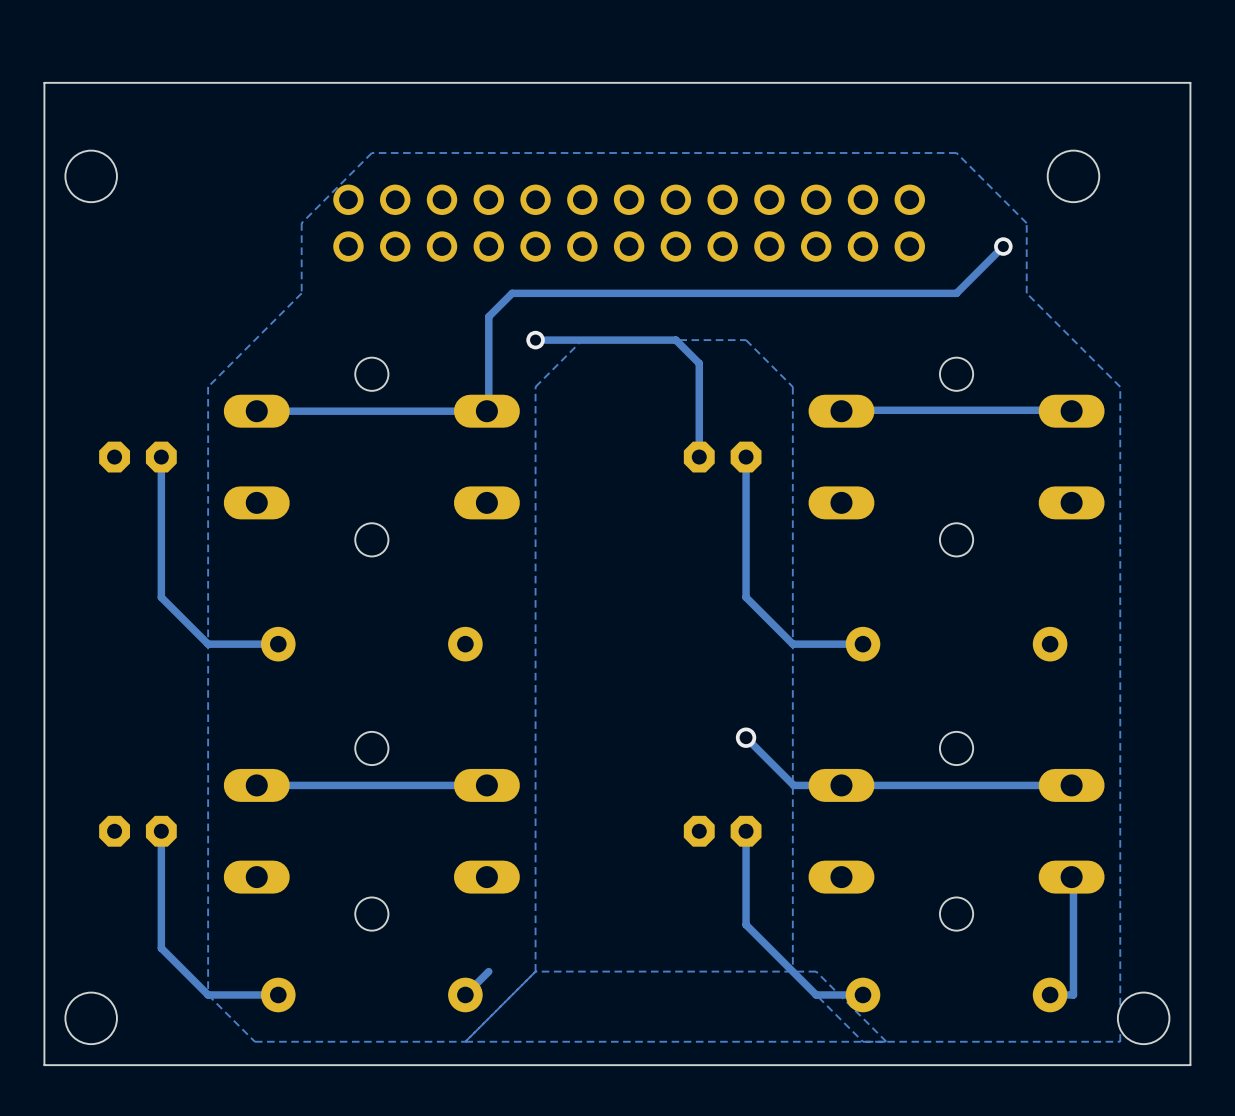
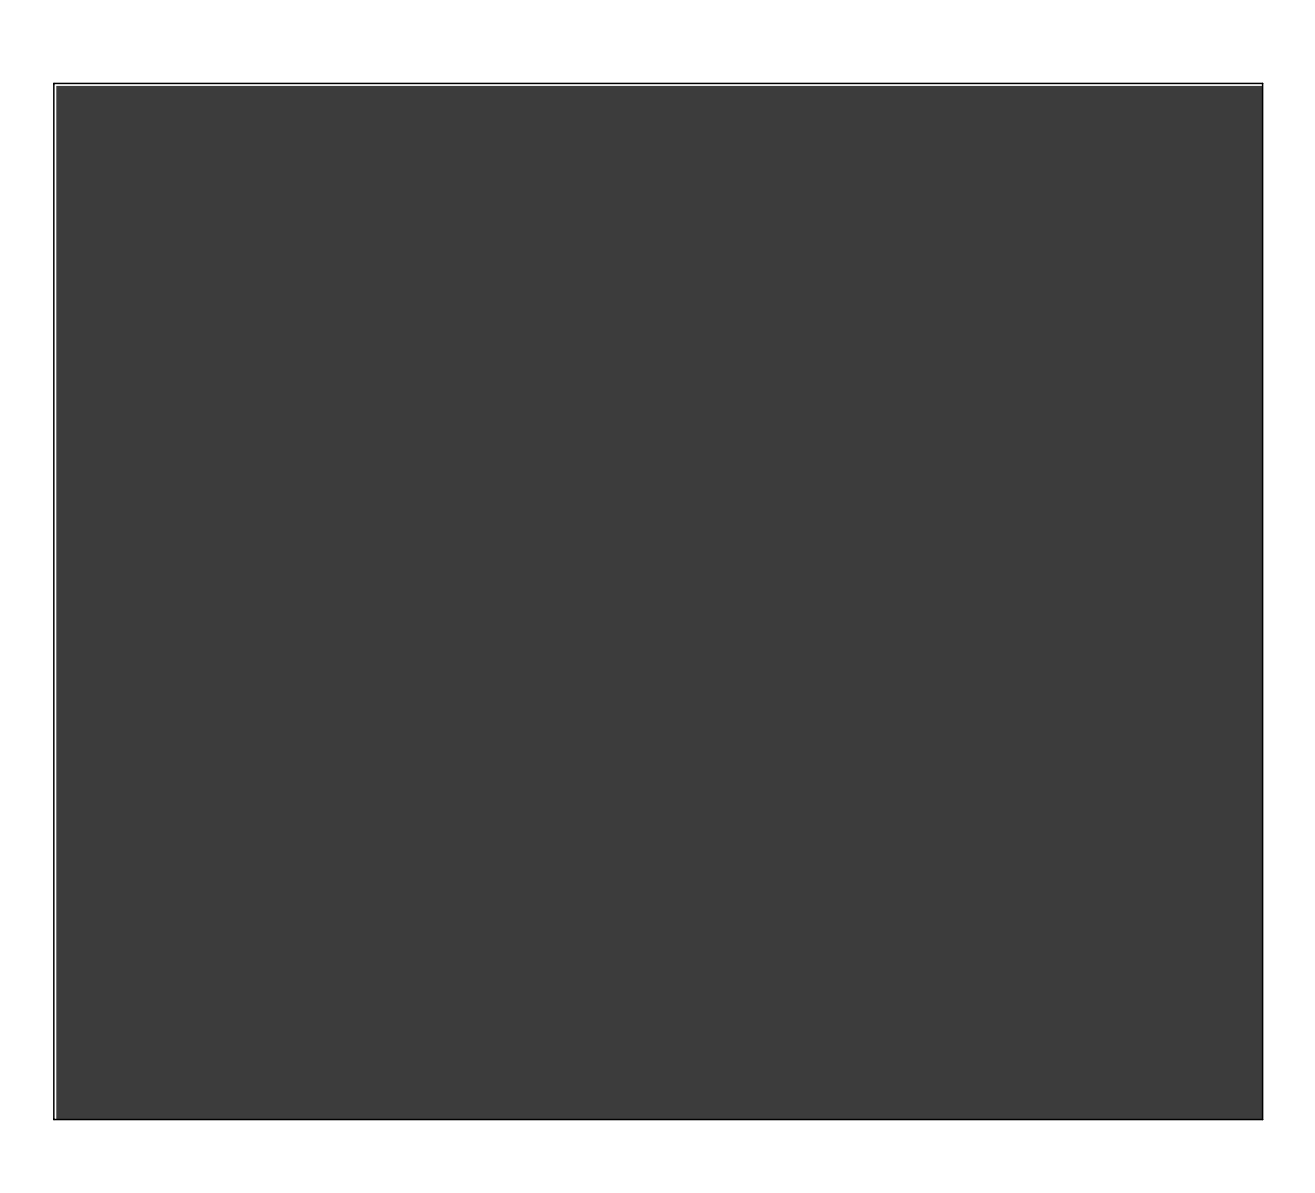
drawing: none -> [56, 85, 1263, 1120]

